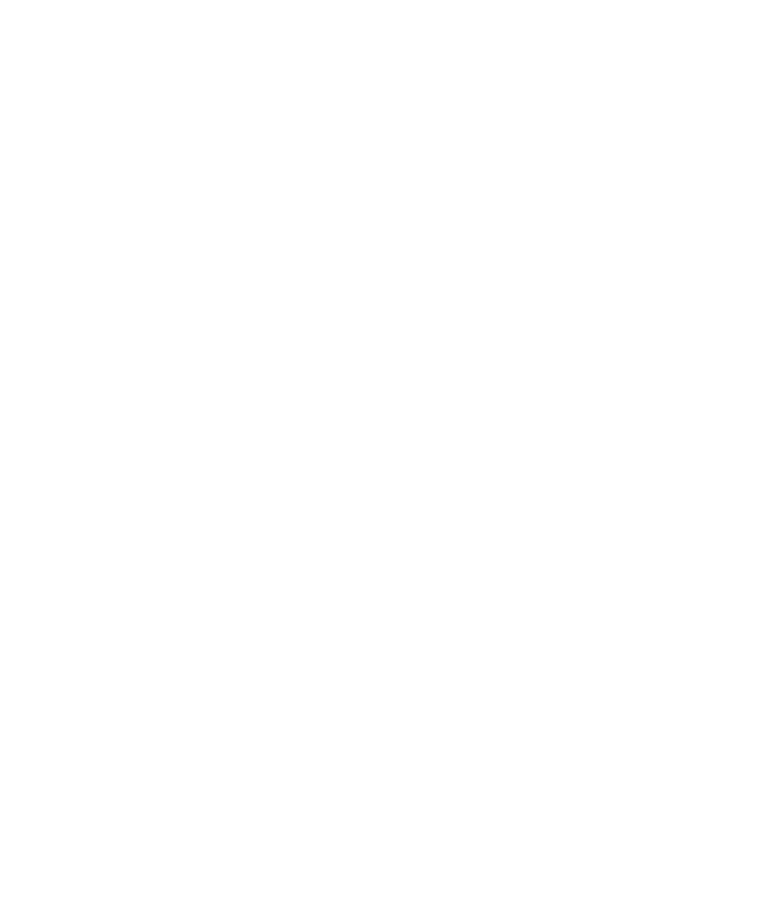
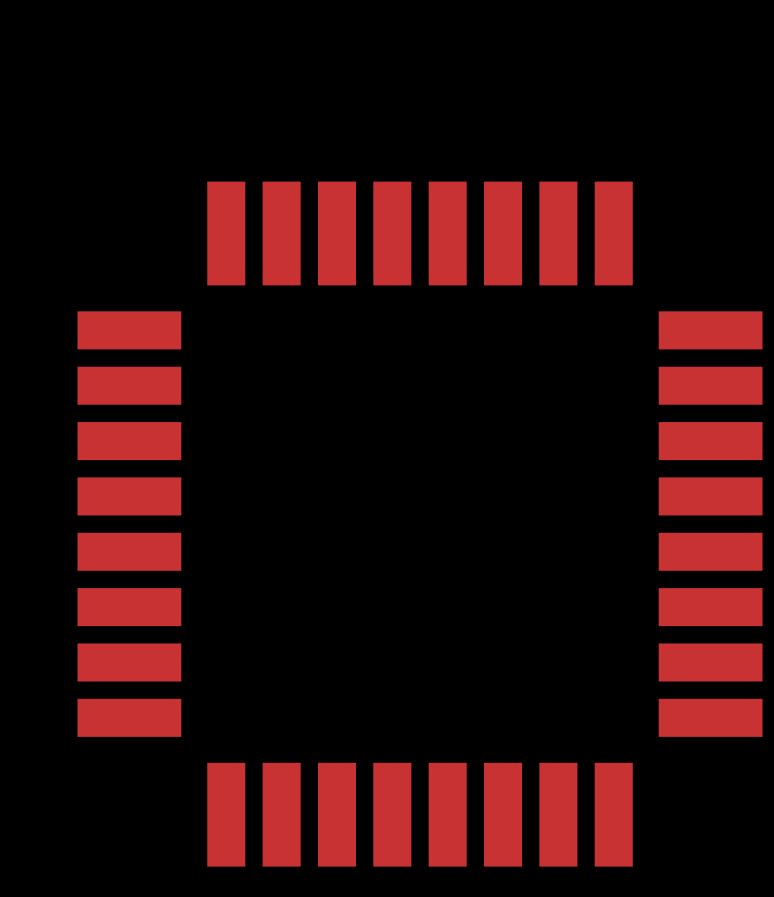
part: none -> (420, 524)

